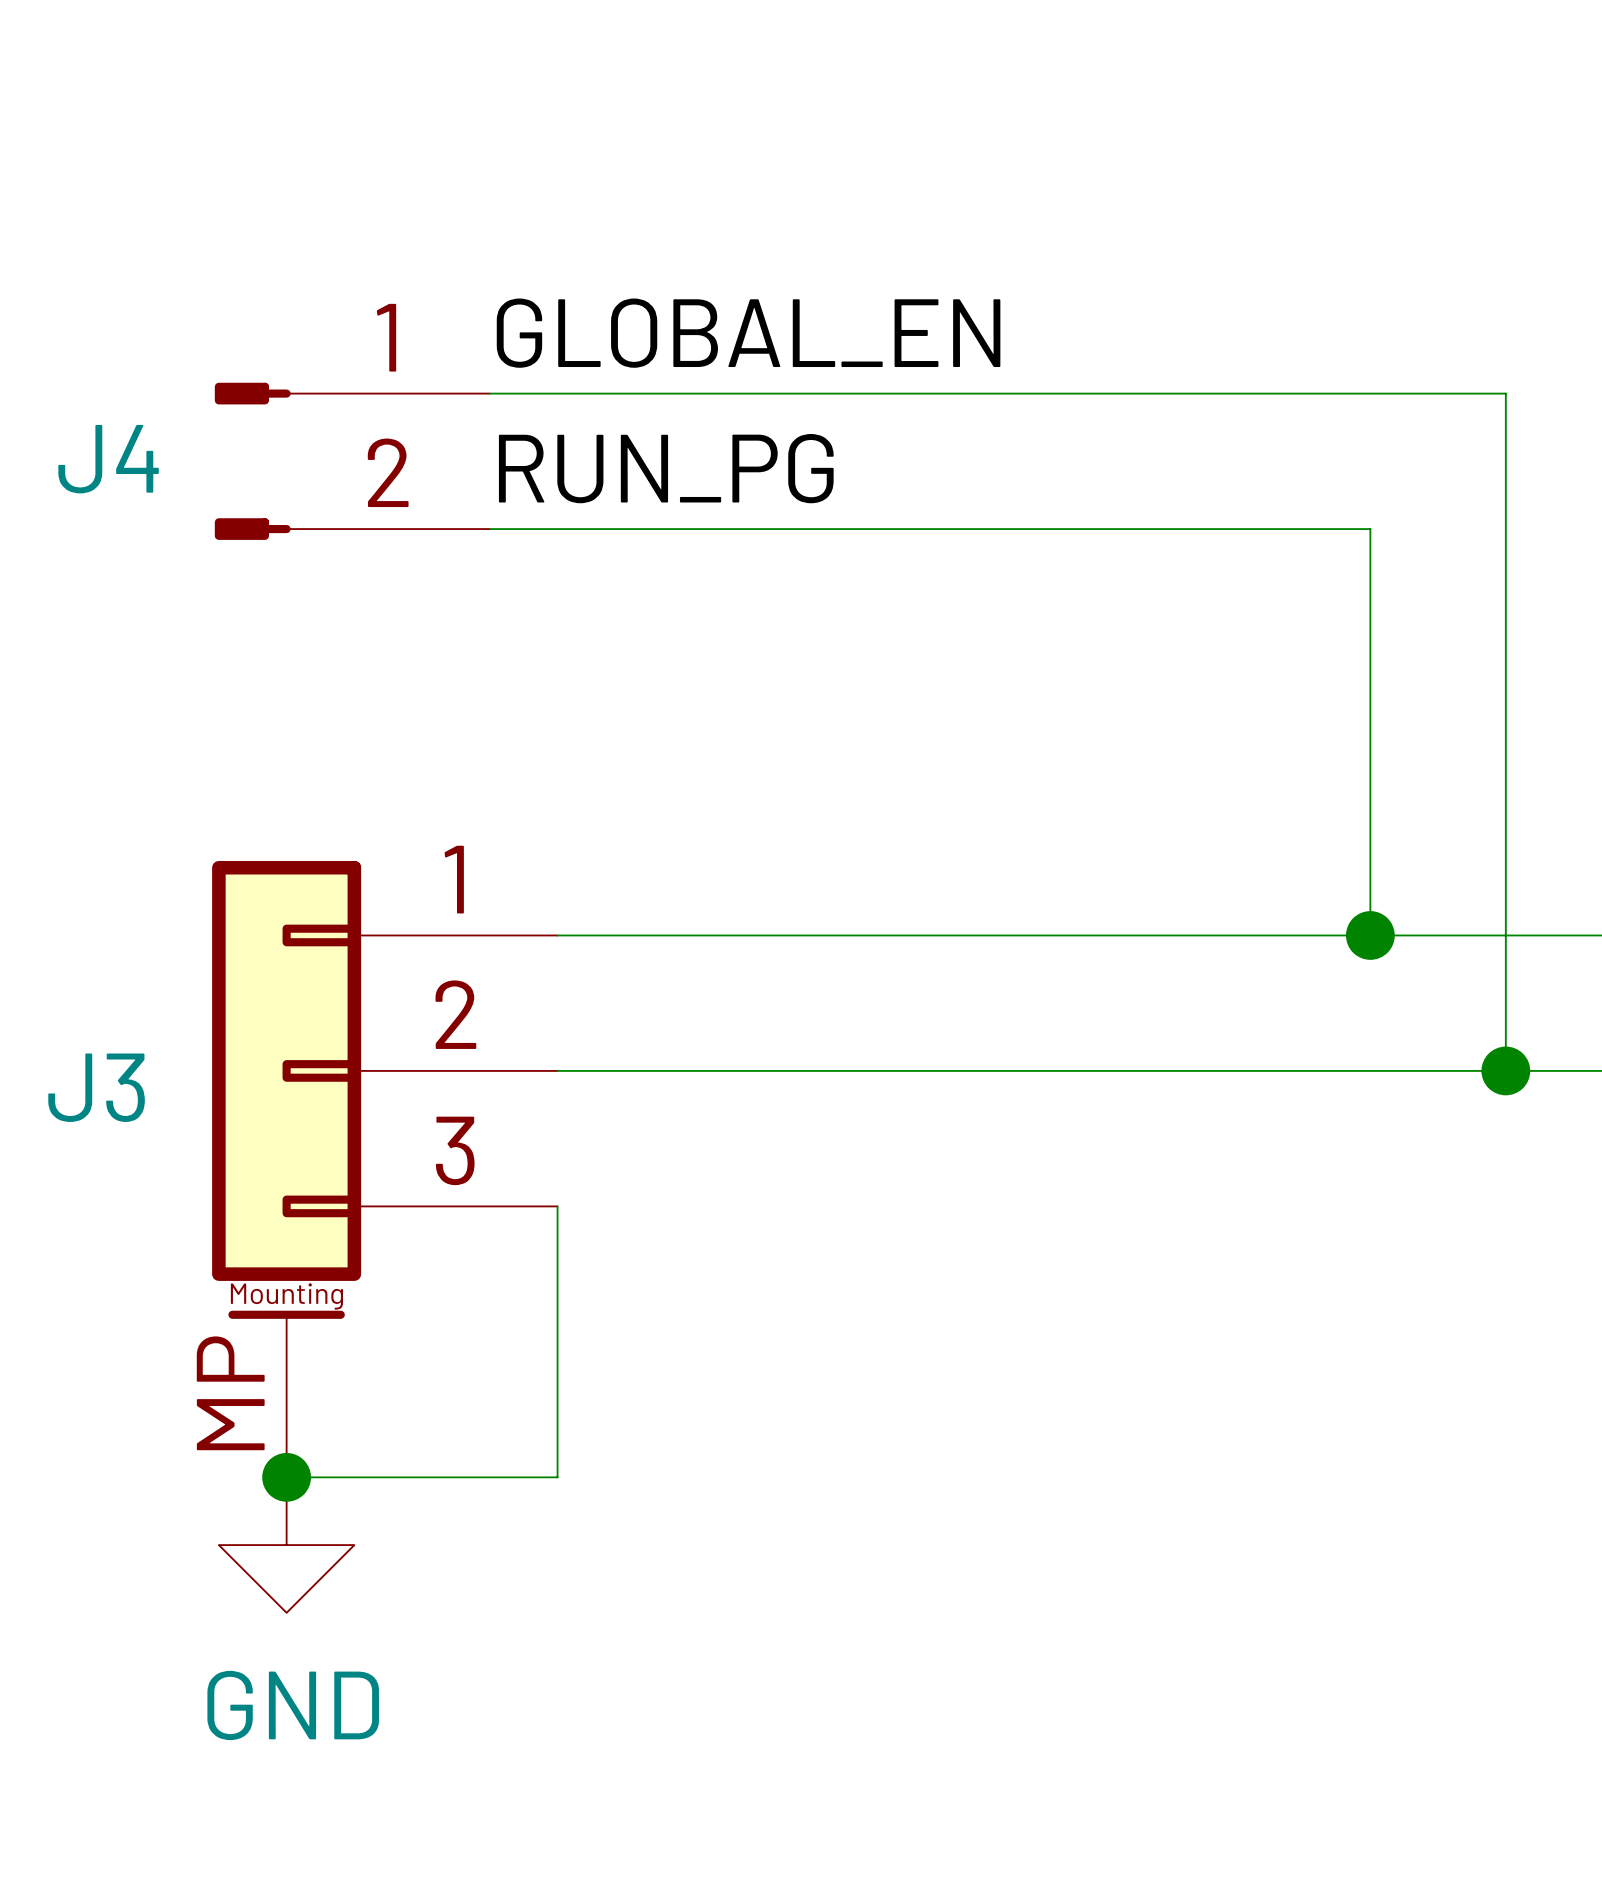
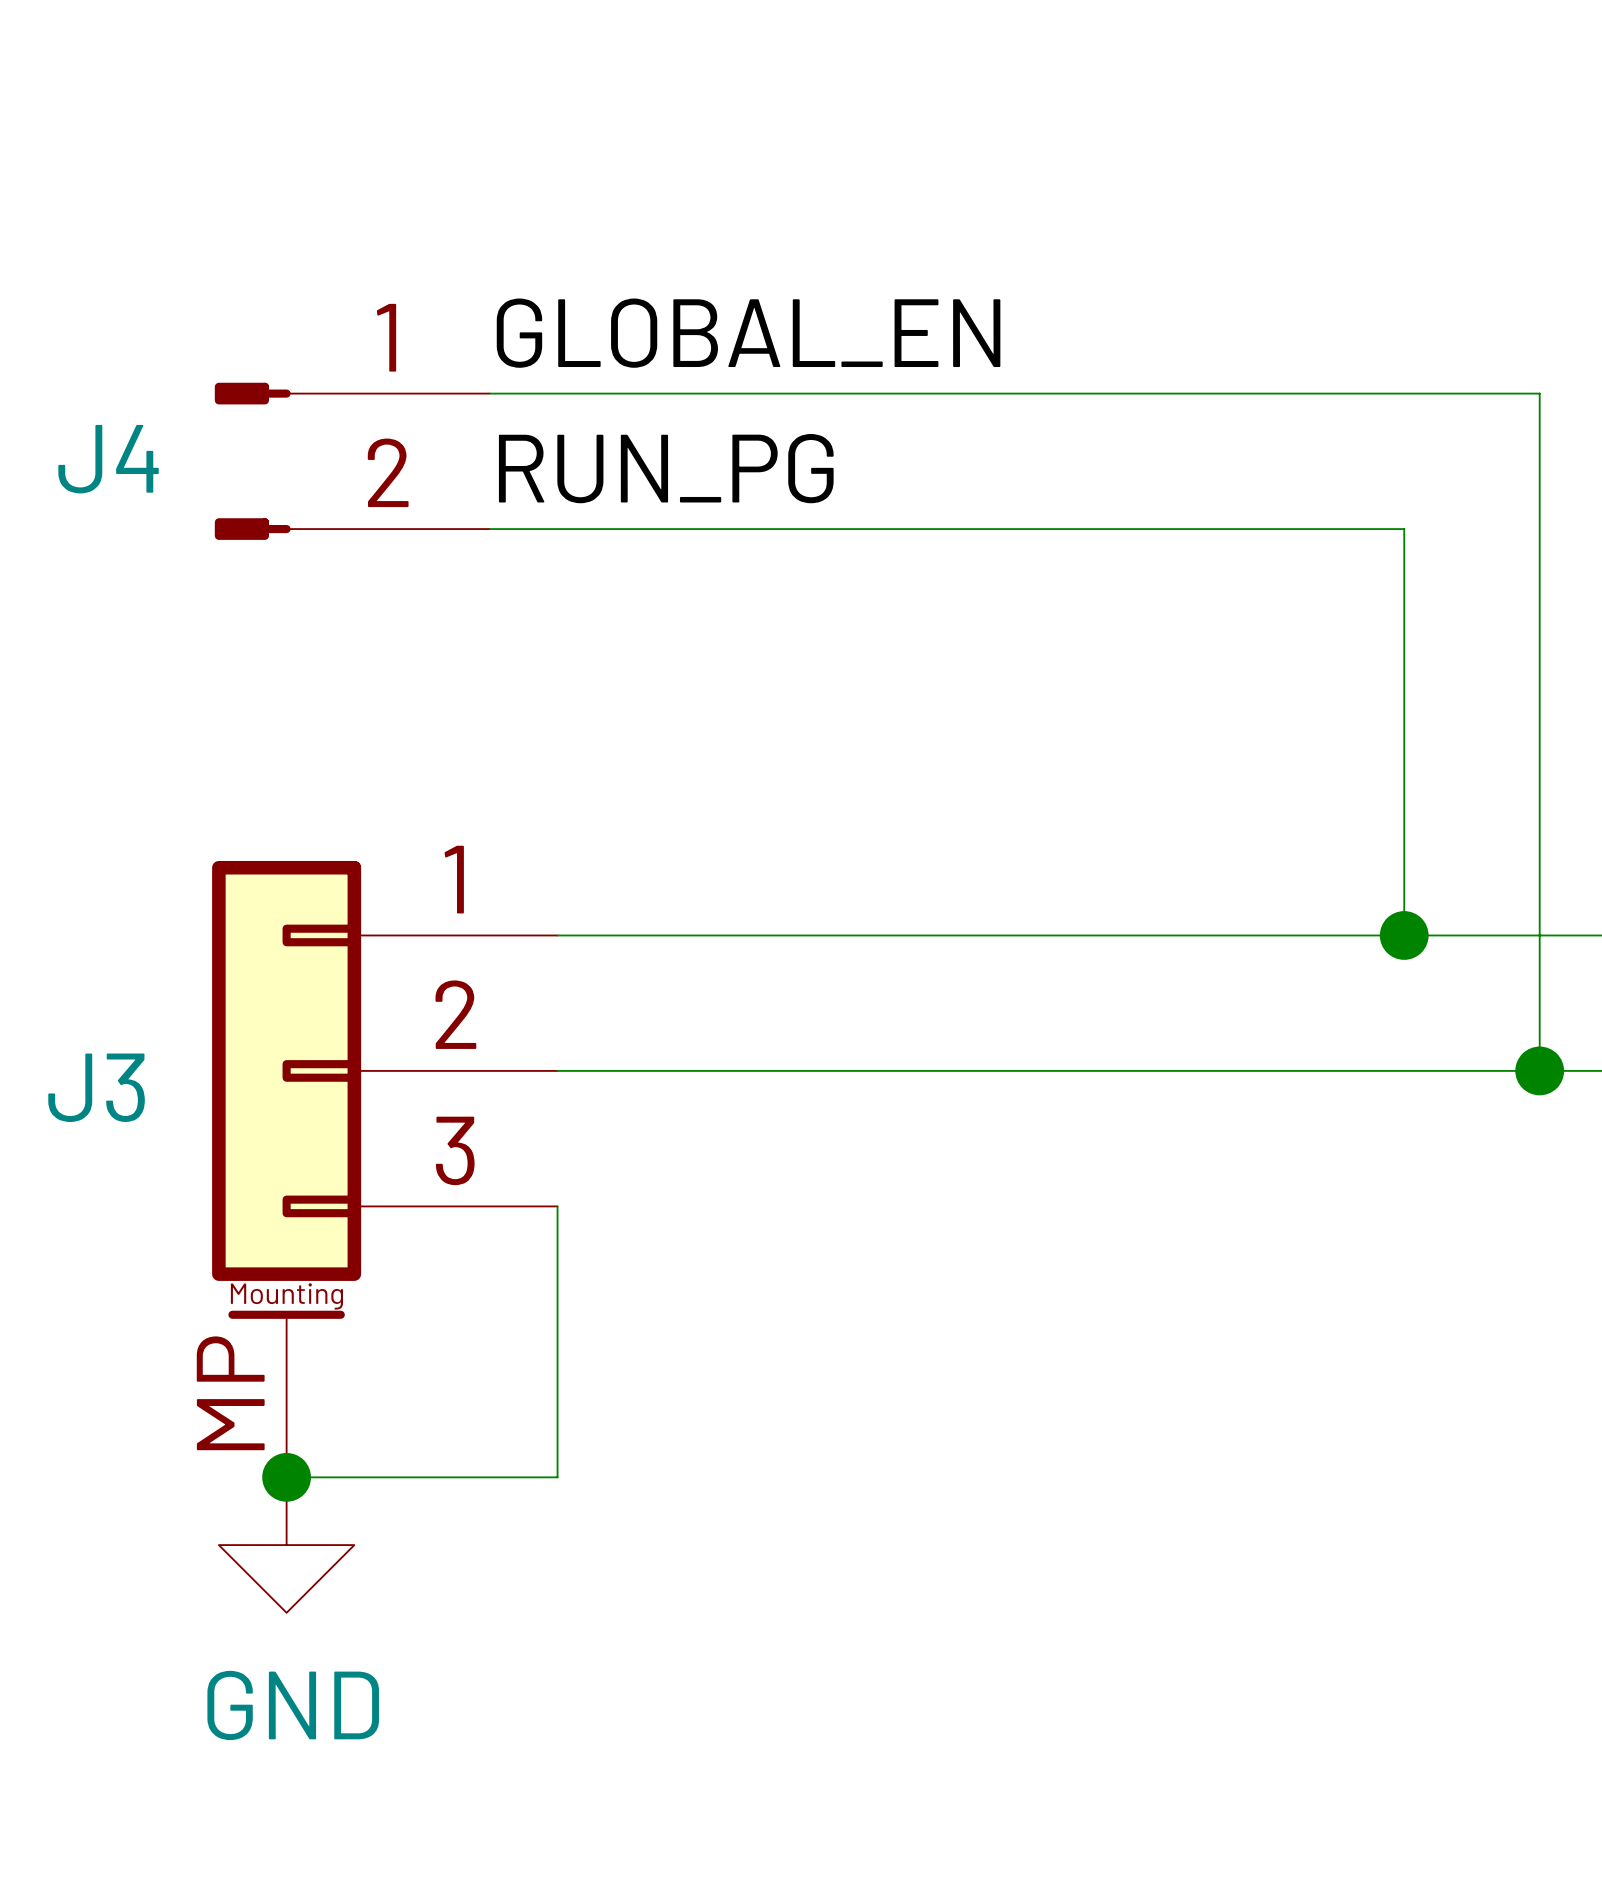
wire: (1505, 393) (1505, 1070) -> (1505, 393) (1539, 393) (1539, 1070)
wire: (1370, 529) (1370, 935) -> (1370, 529) (1404, 529) (1404, 935)
junction position: (1370, 935) -> (1404, 935)
junction position: (1505, 1070) -> (1539, 1070)

